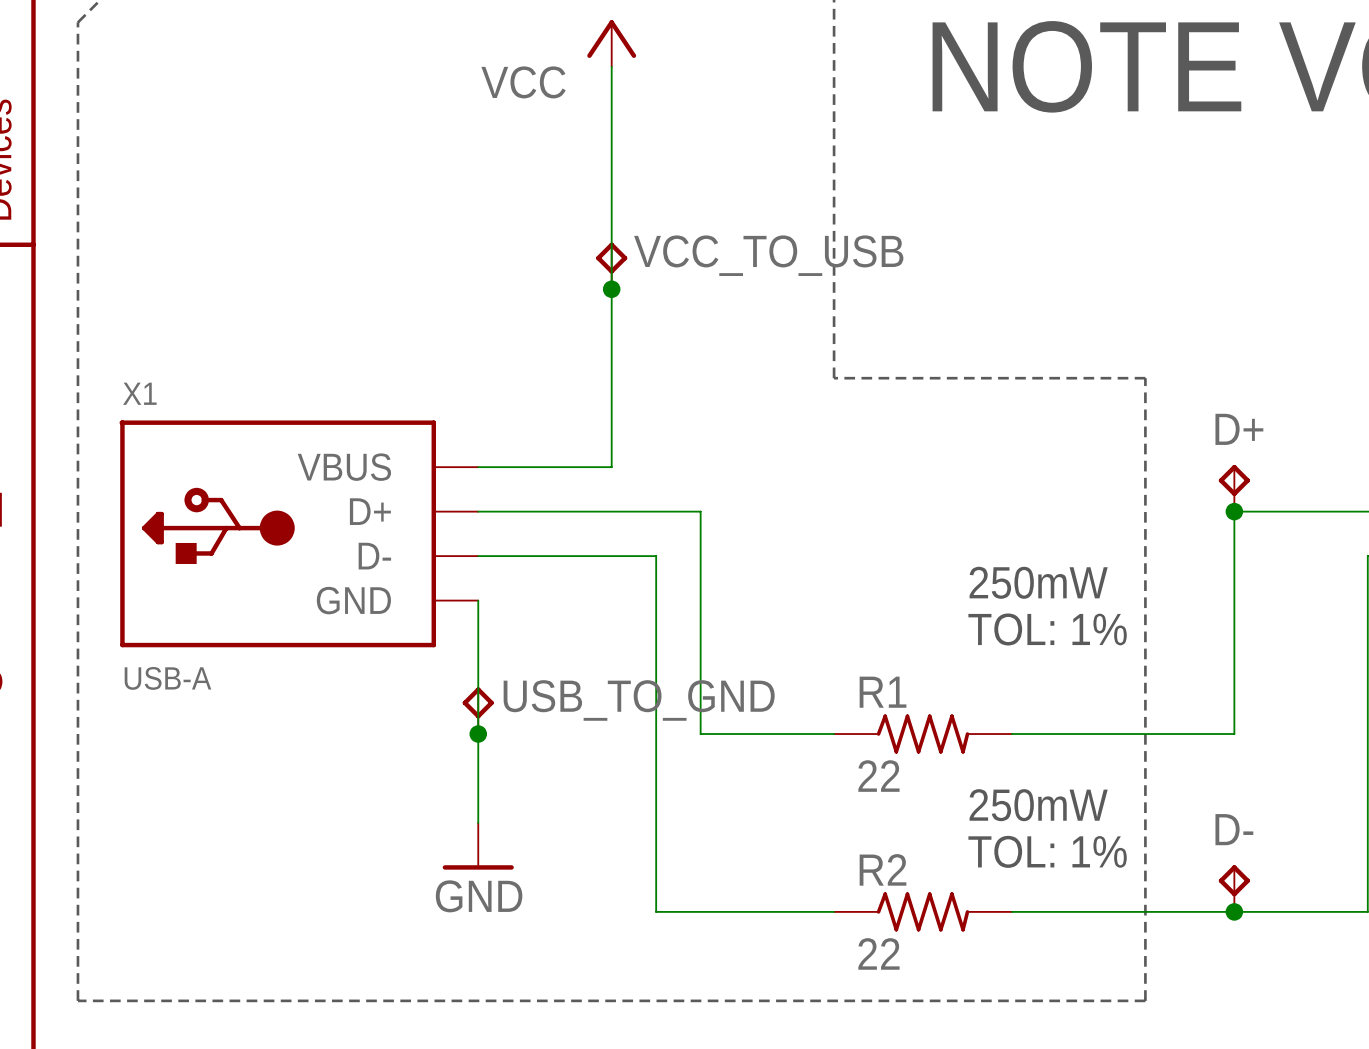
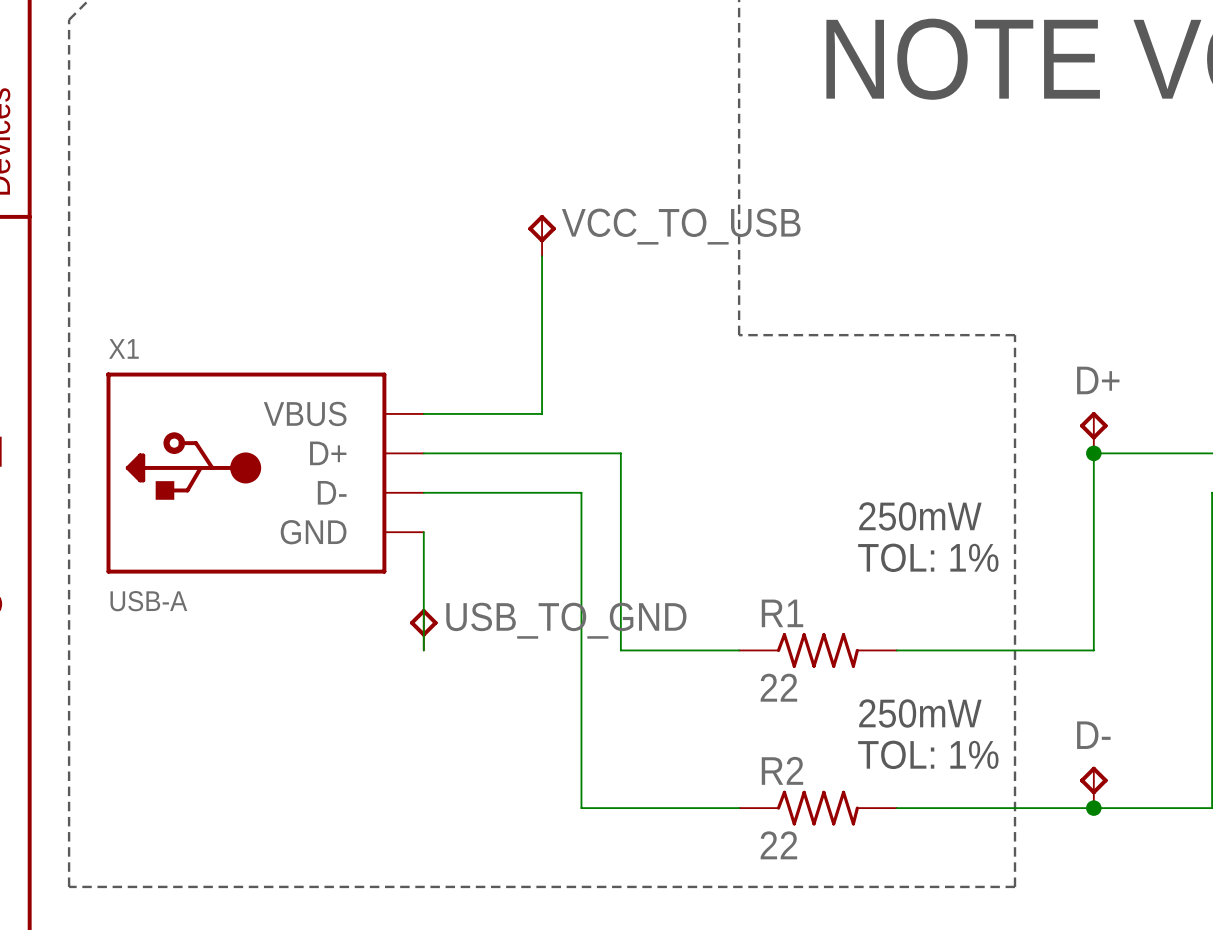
power symbol: VCC (611, 43) -> none
wire: (611, 66) (611, 289) -> none
junction: (611, 289) -> none
wire: (478, 734) (478, 822) -> none
junction: (478, 734) -> none
power symbol: GND (478, 846) -> none

